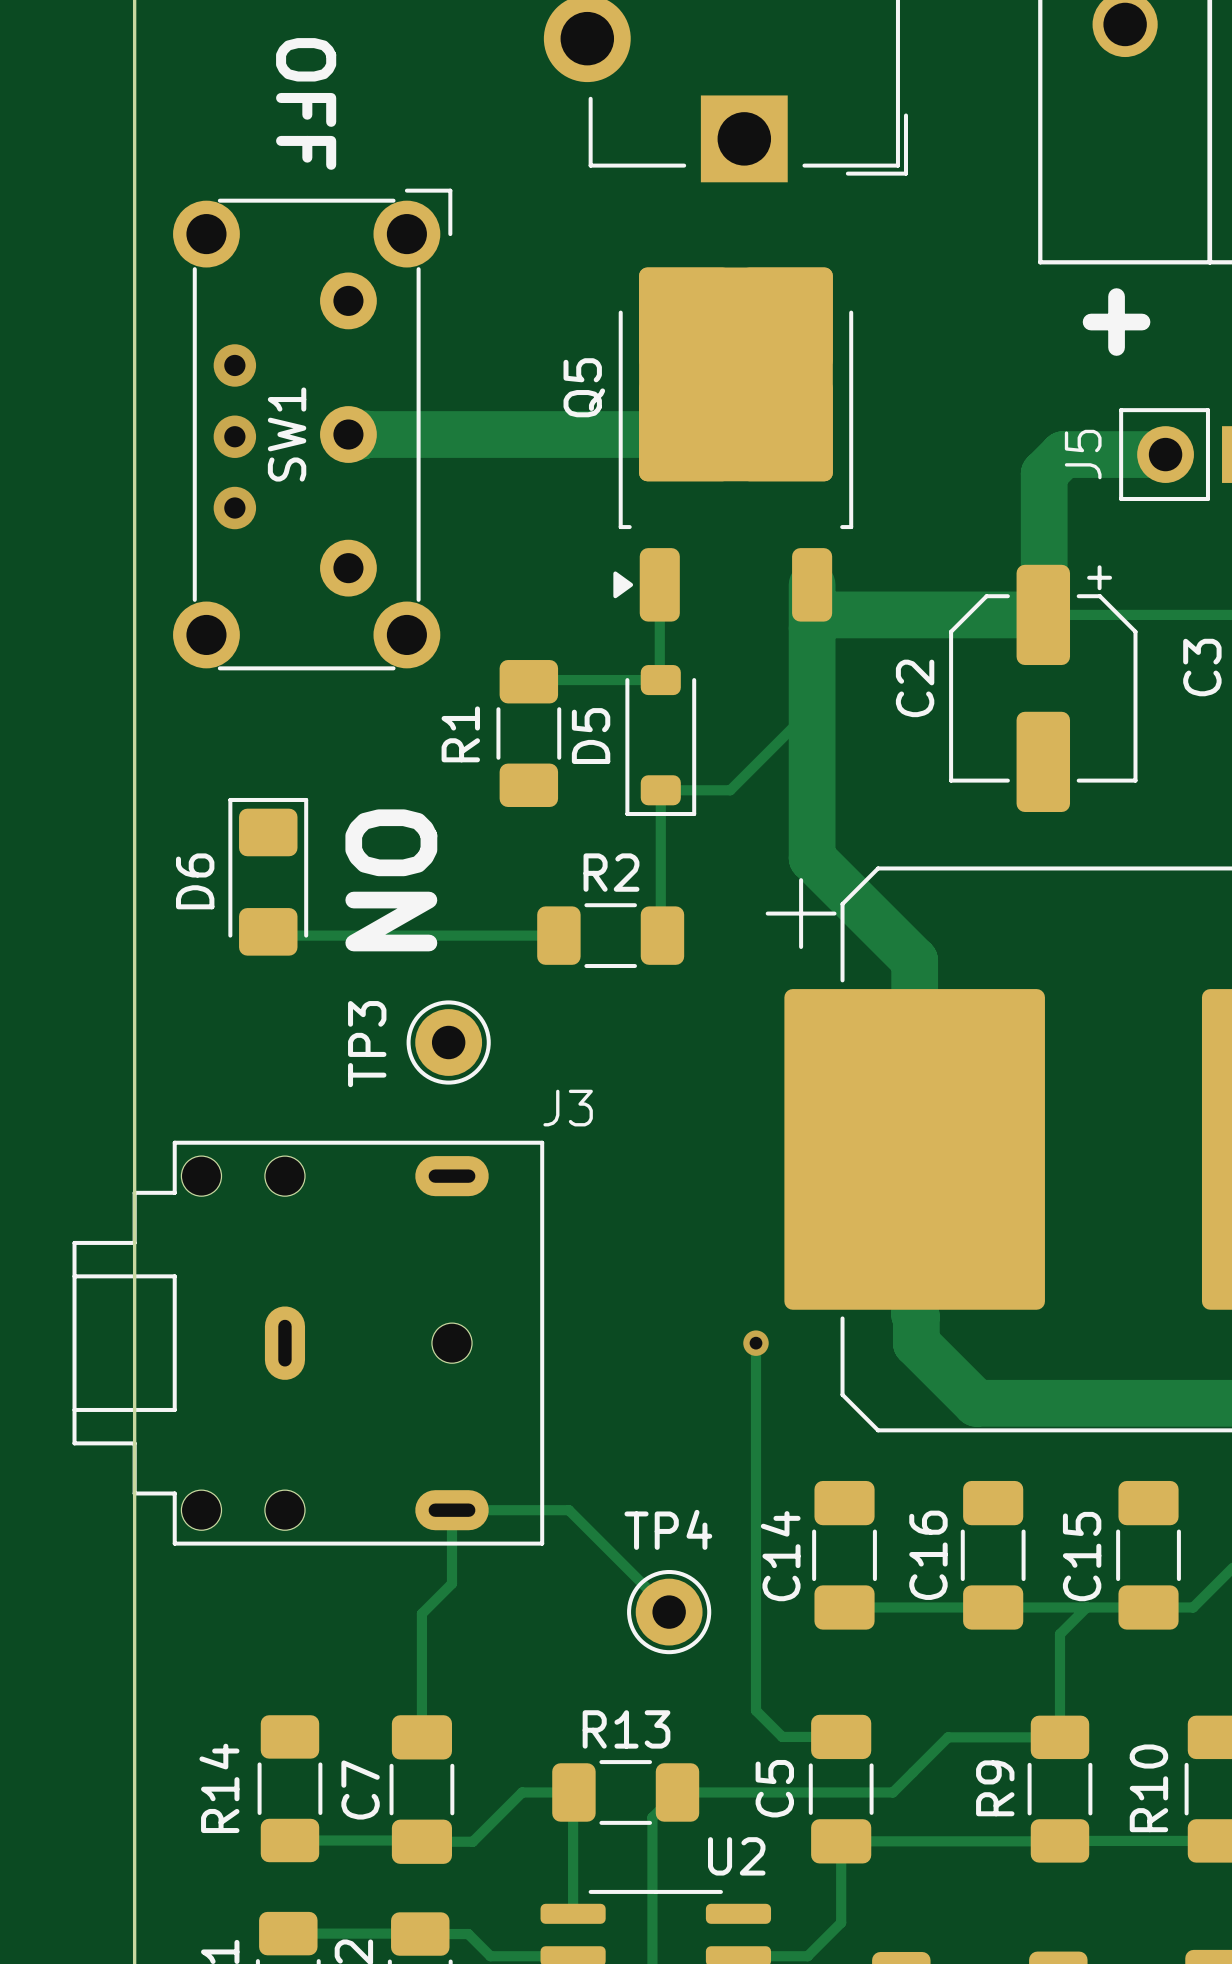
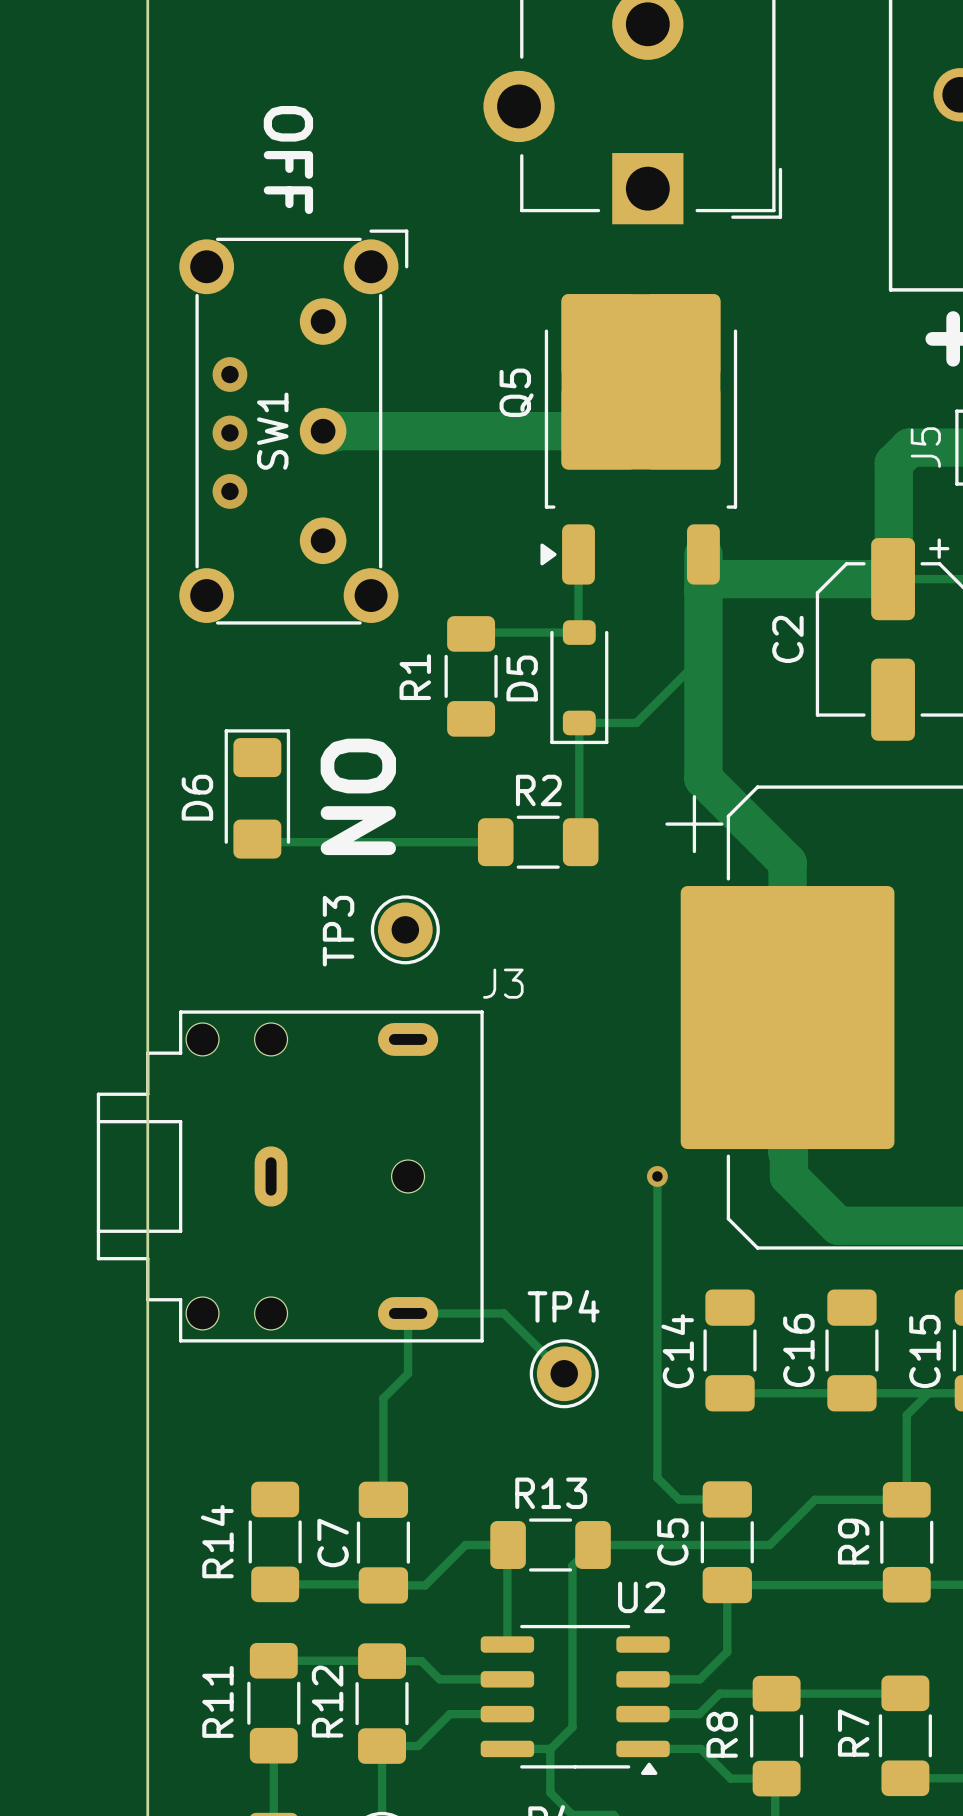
TP4 position: (669, 1612) -> (564, 1373)

